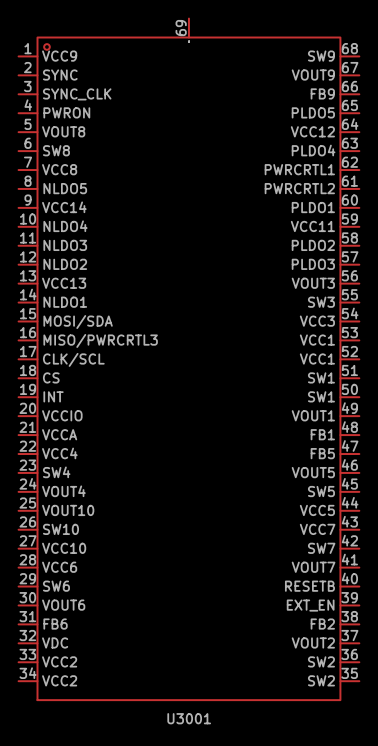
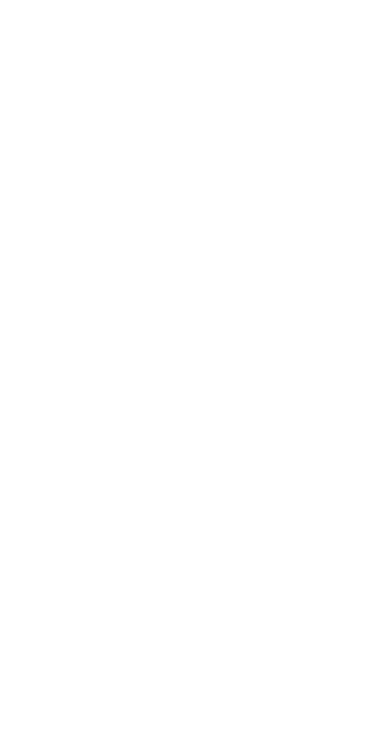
U3001: (188, 359) -> none

